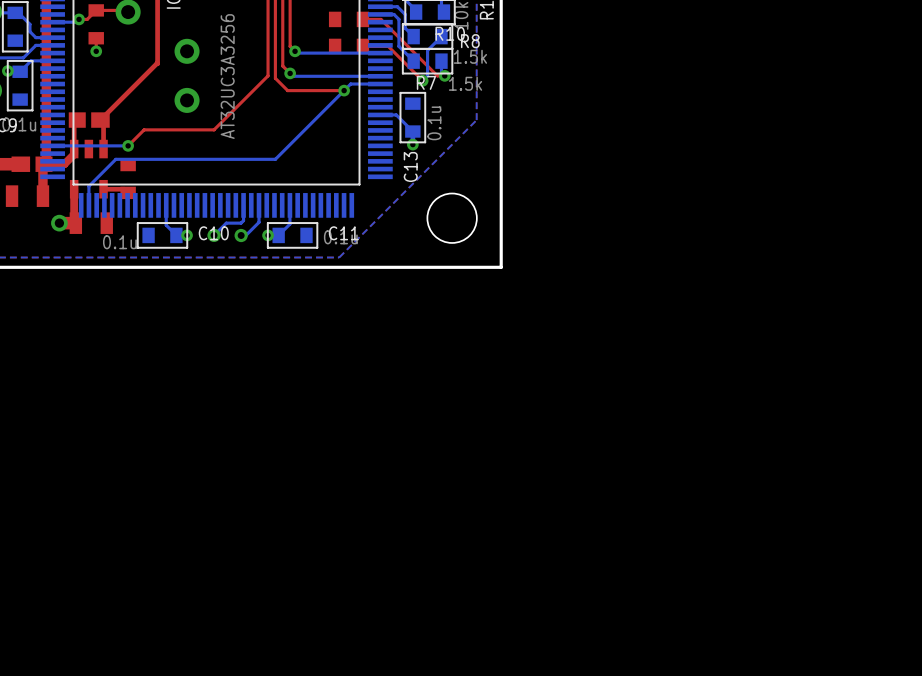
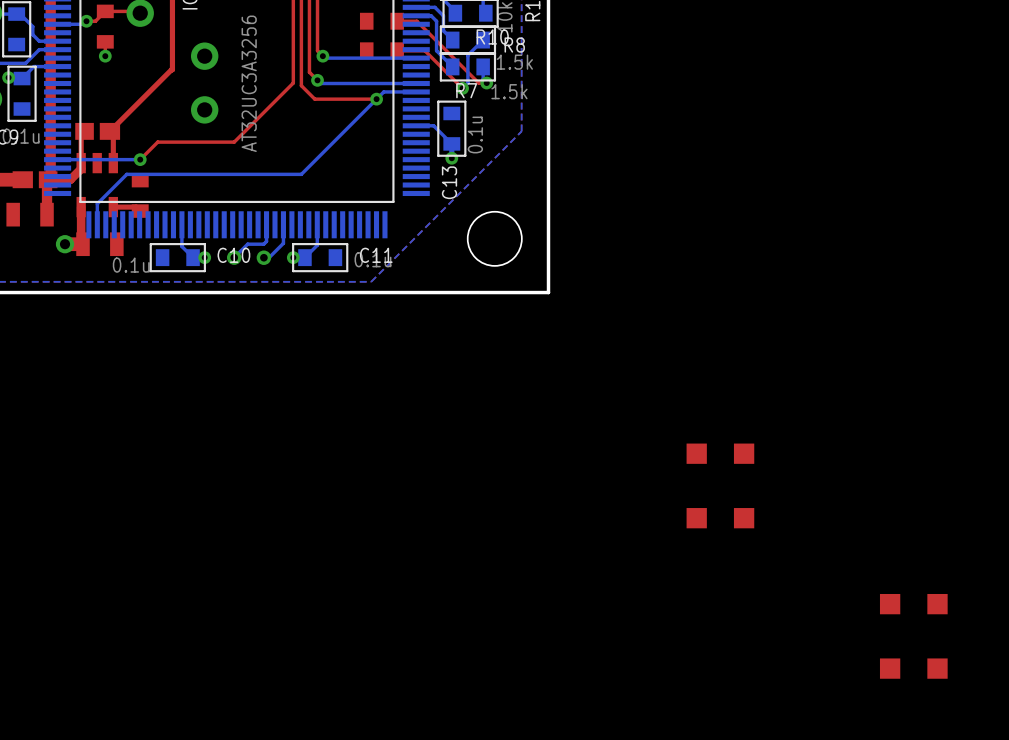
part: none -> (720, 453)
part: none -> (720, 518)
part: none -> (913, 604)
part: none -> (913, 668)

